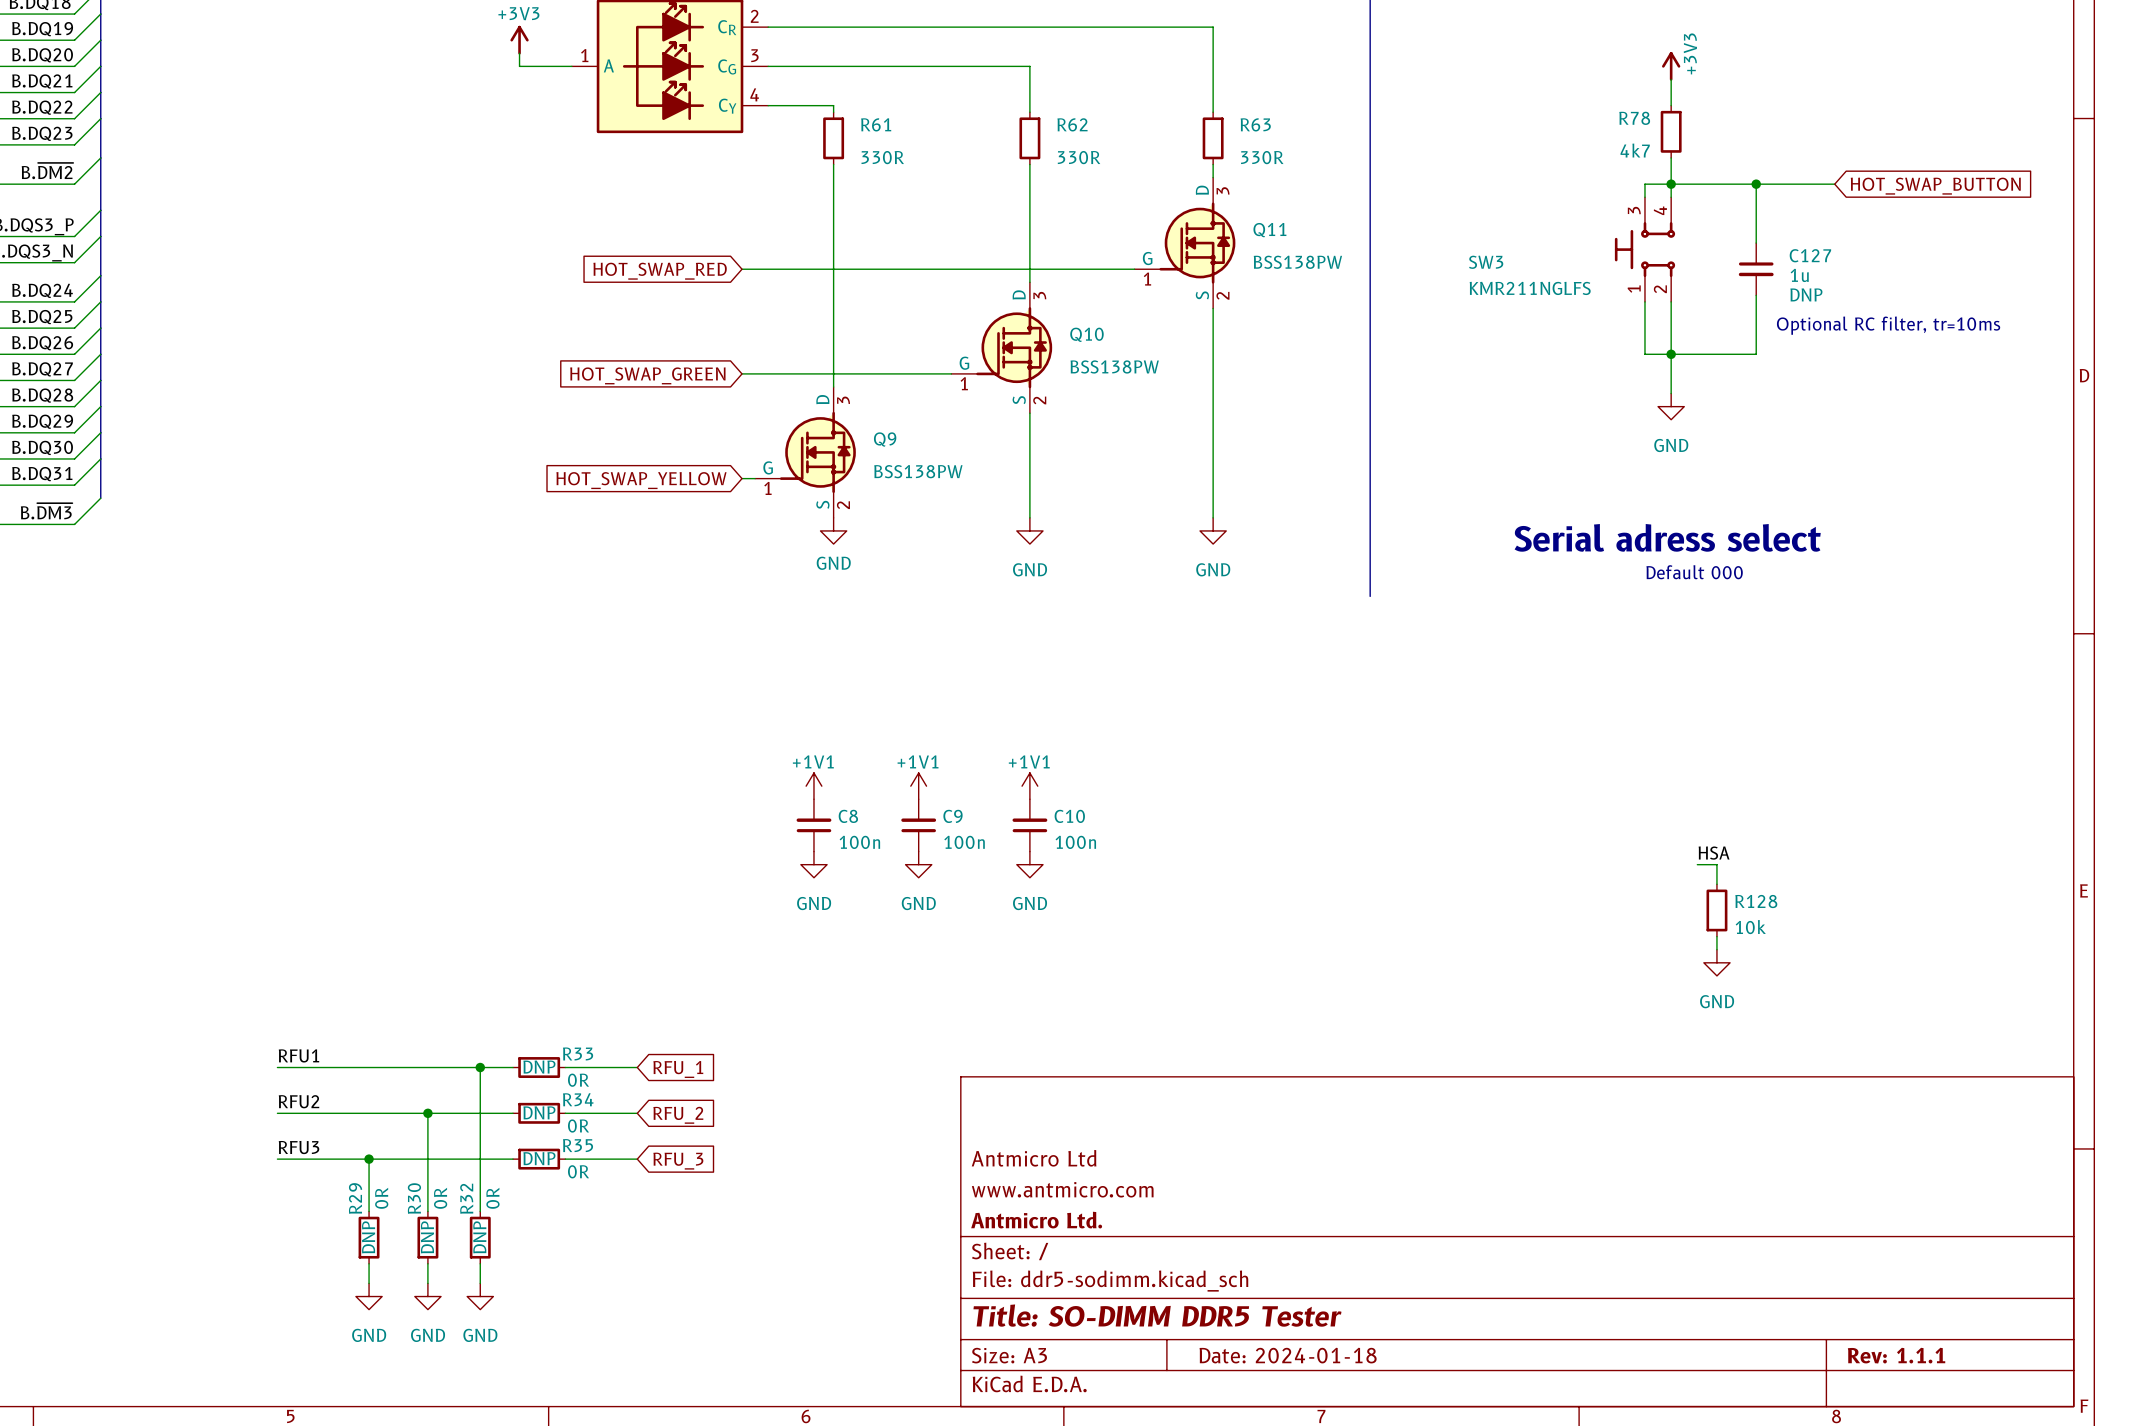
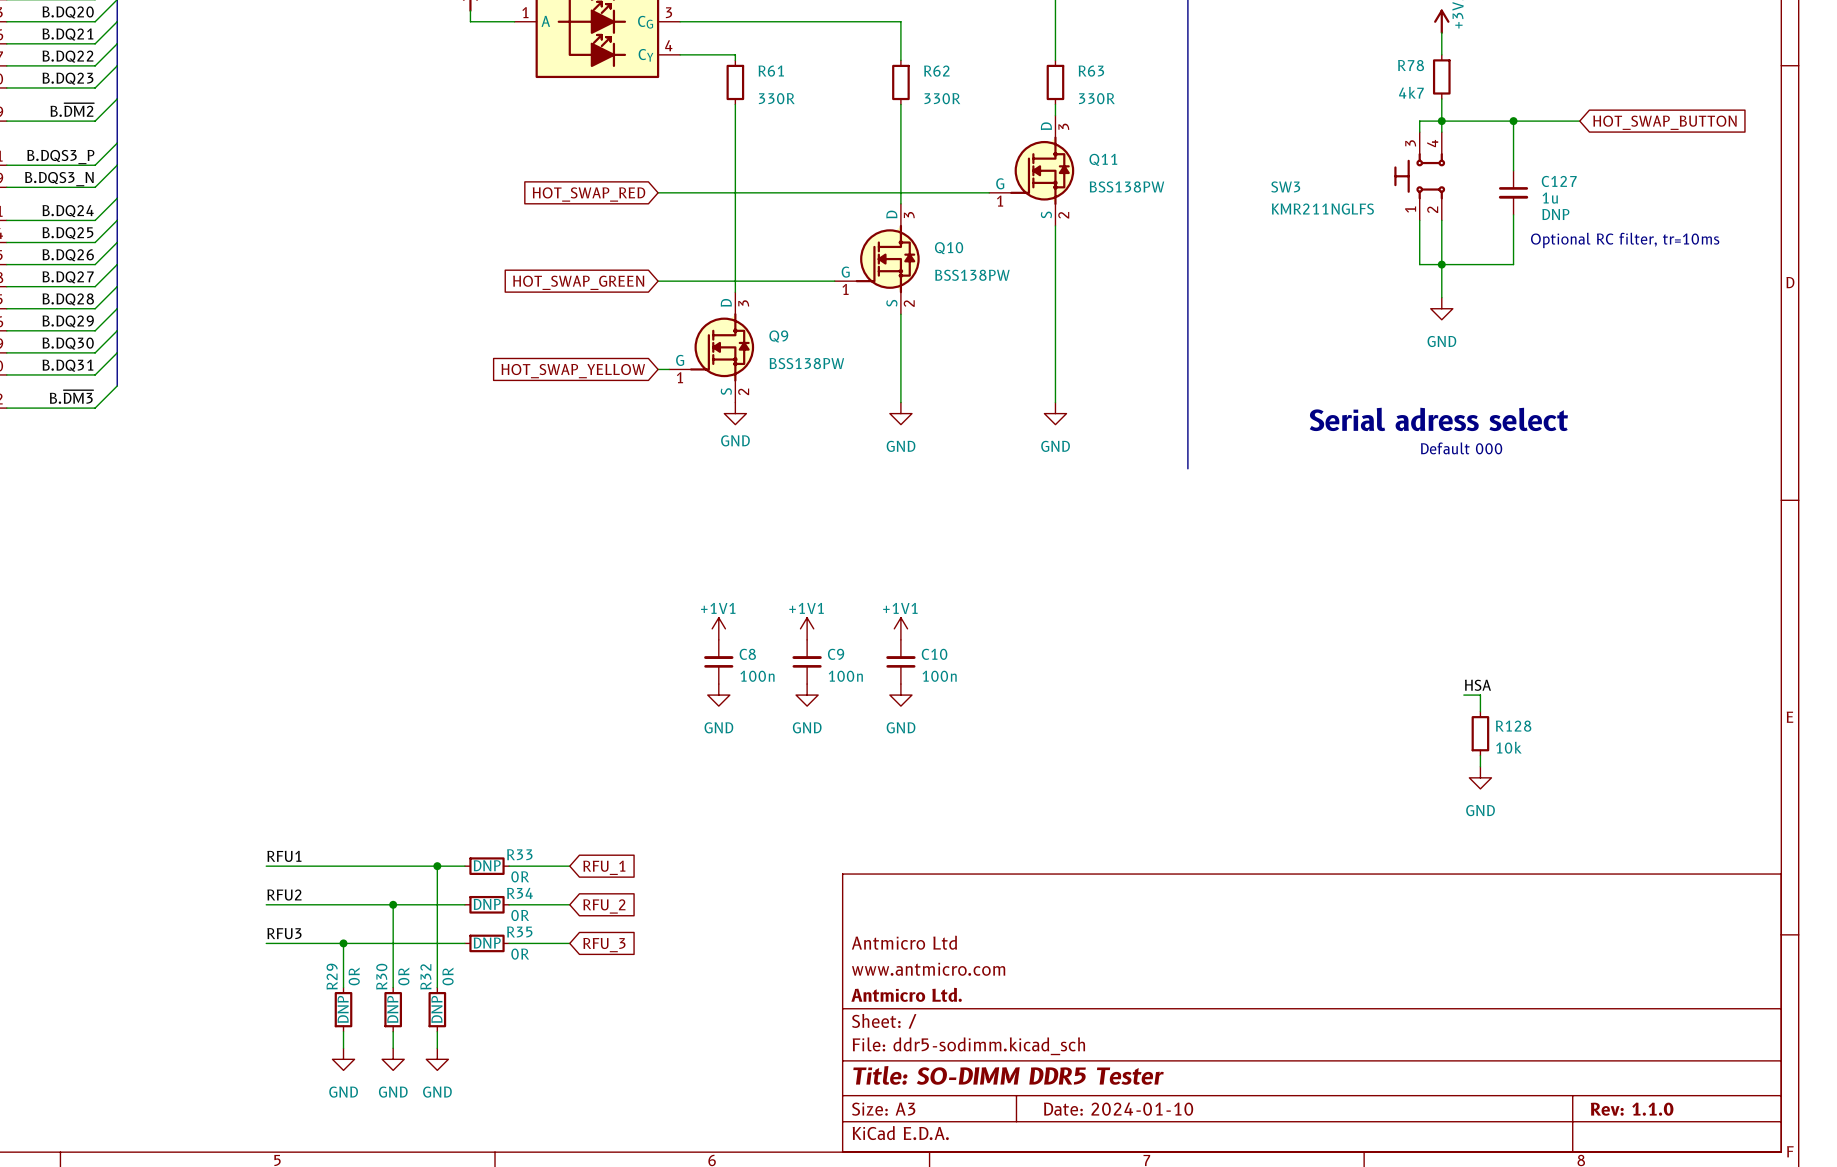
title block: Date: 2024-01-18 (1288, 1355) -> Date: 2024-01-10 (1118, 1109)
title block: Rev: 1.1.1 (1896, 1355) -> Rev: 1.1.0 (1632, 1109)

